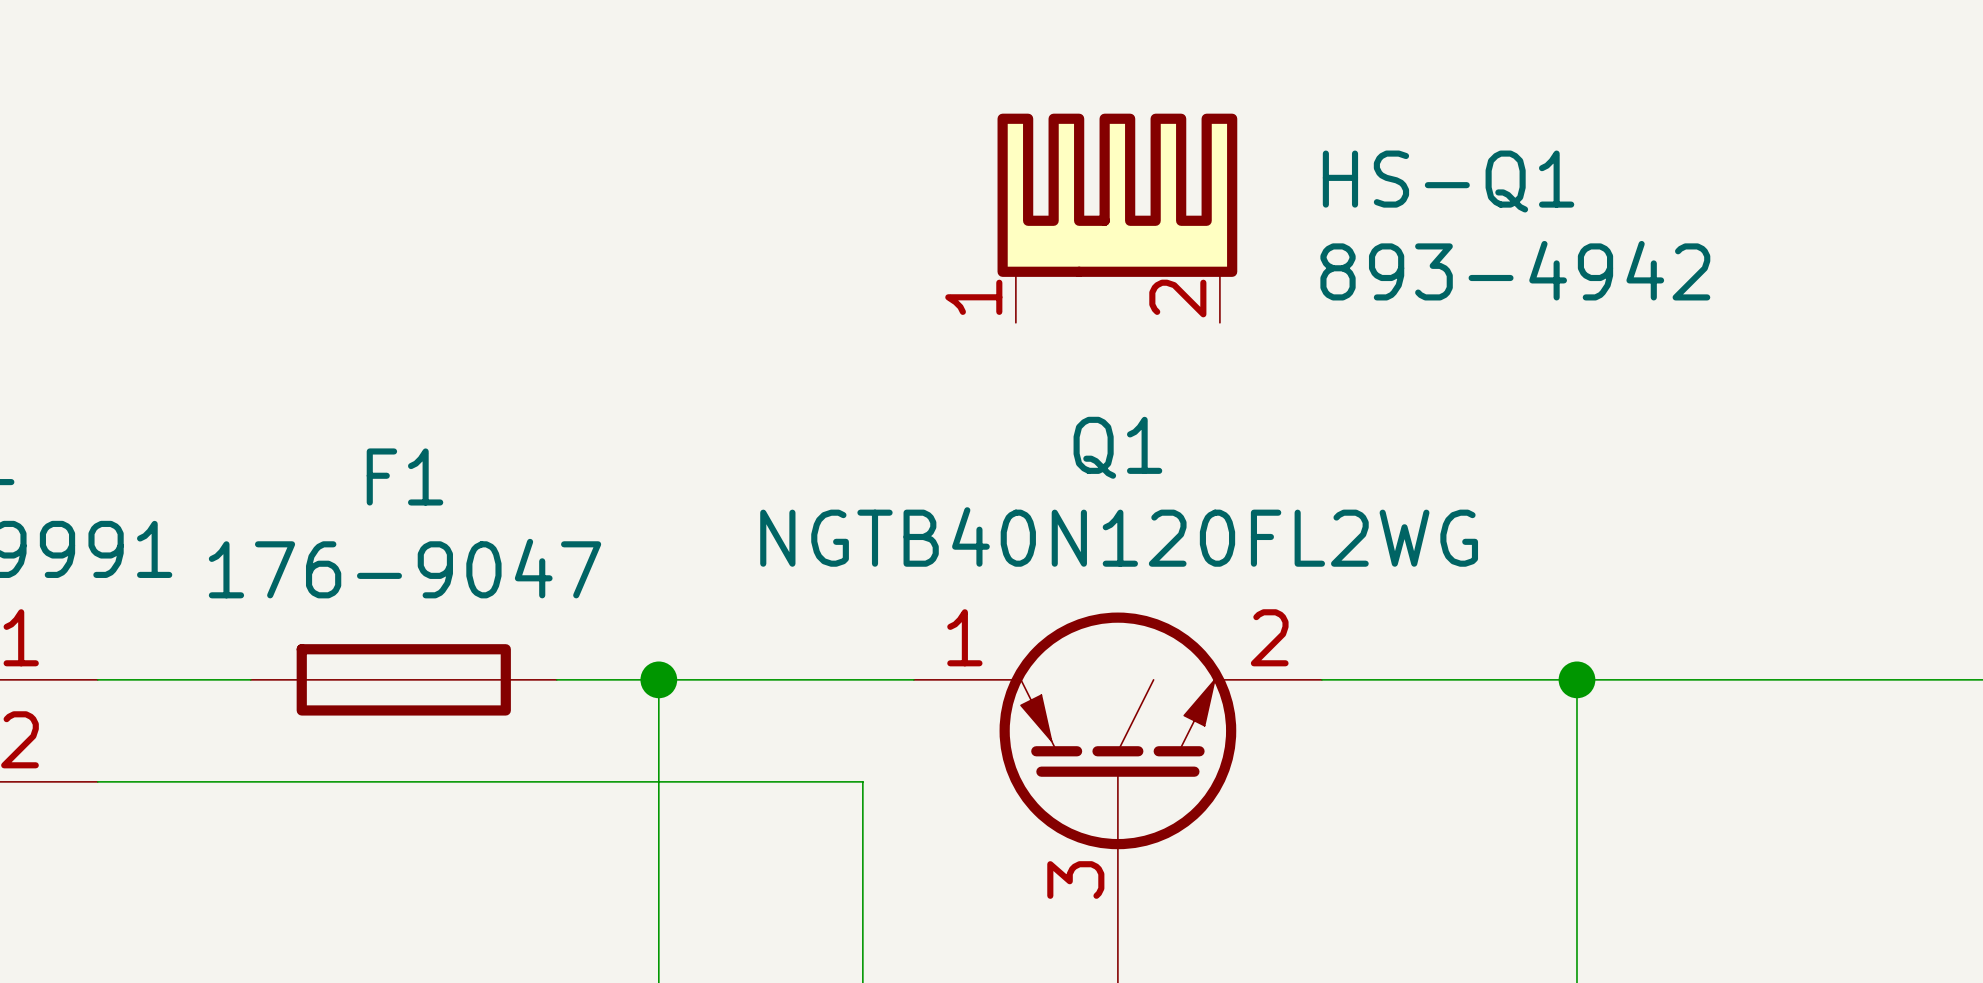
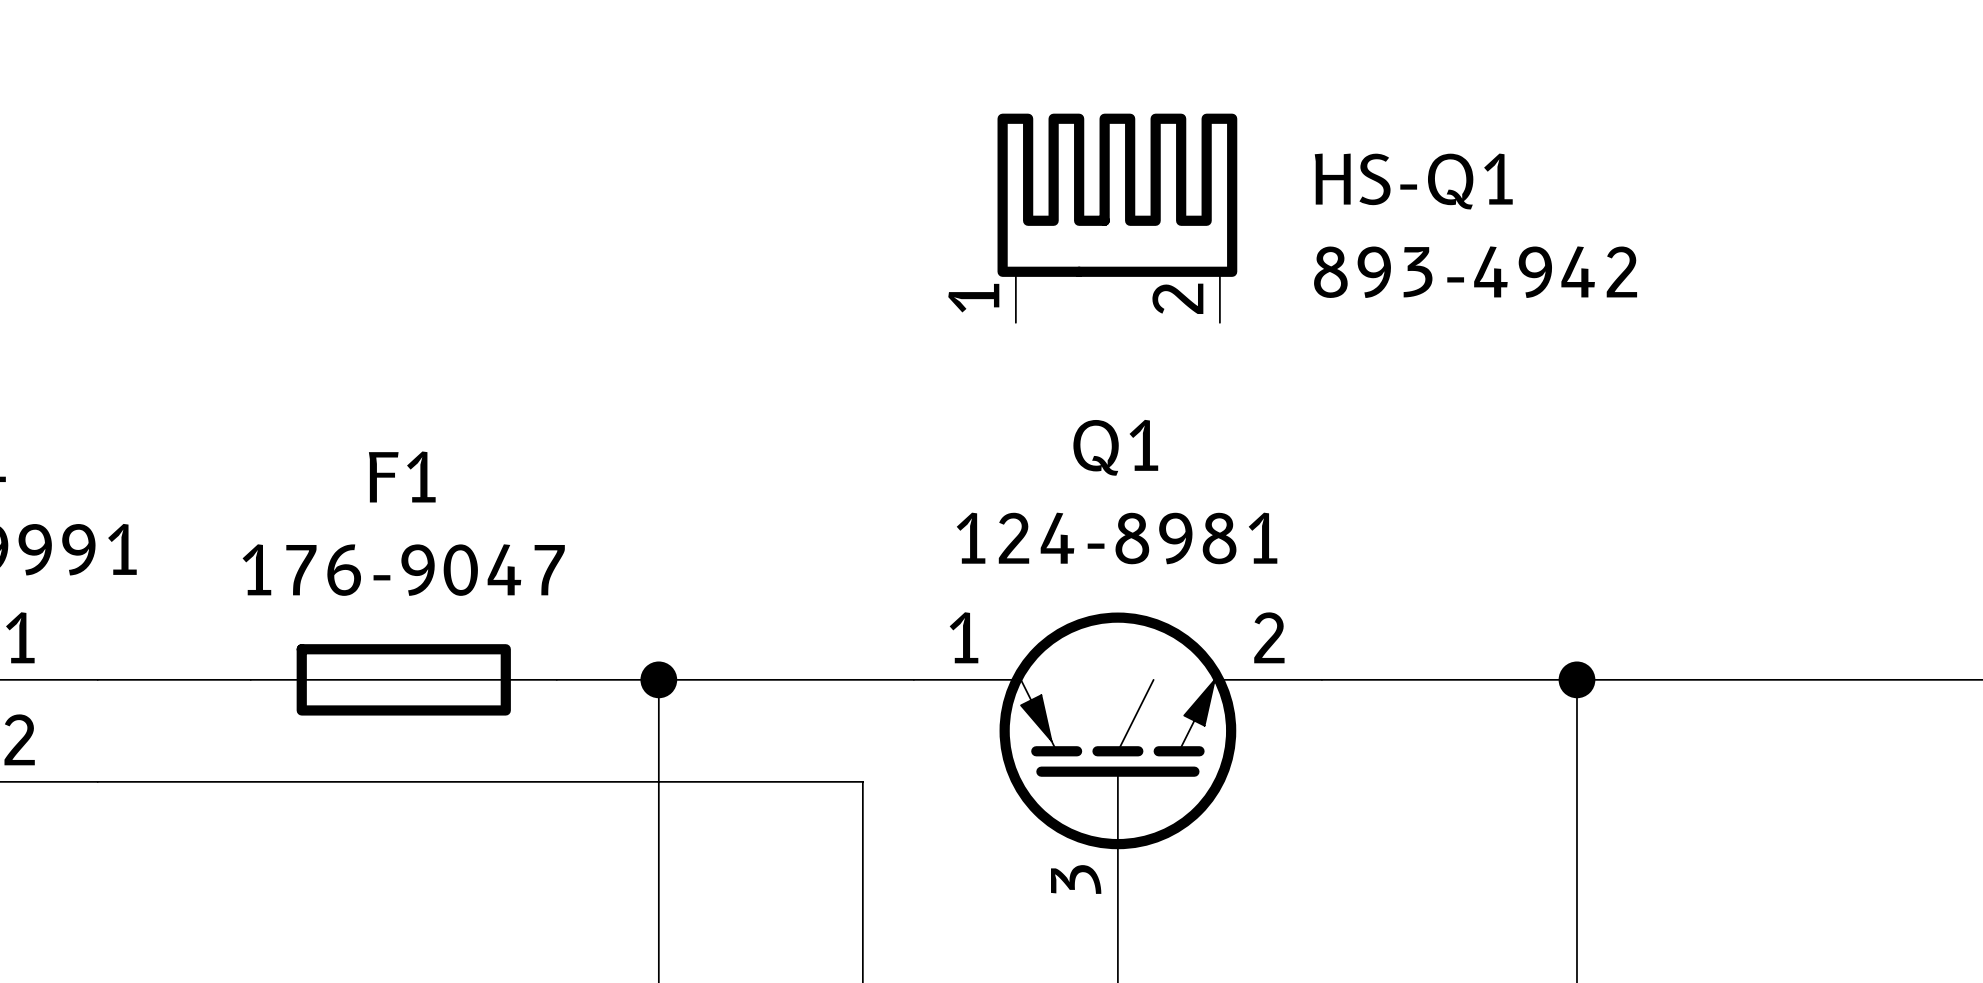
Q1 value: NGTB40N120FL2WG (1119, 536) -> 124-8981 (1117, 538)

